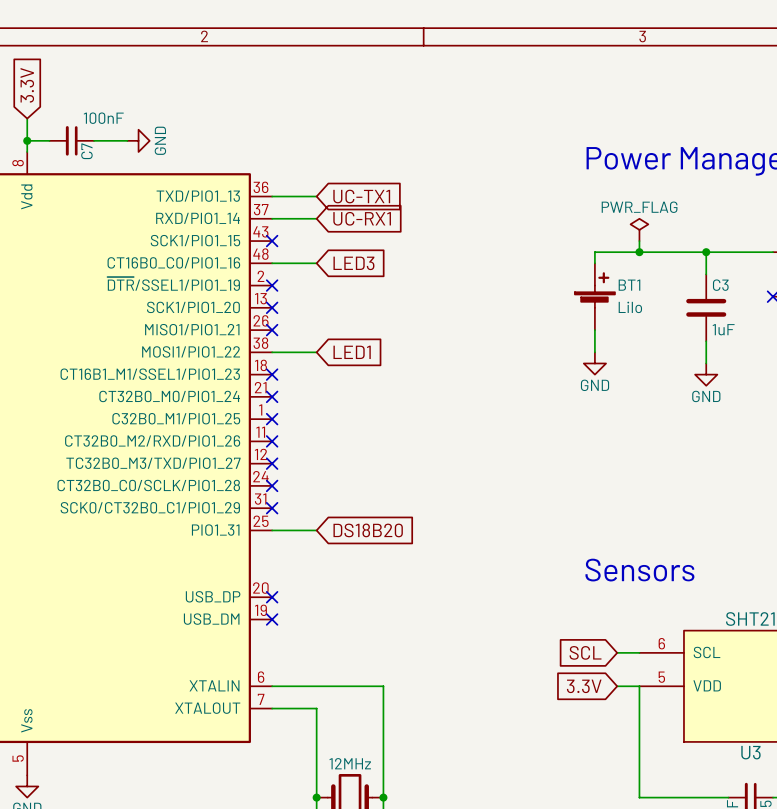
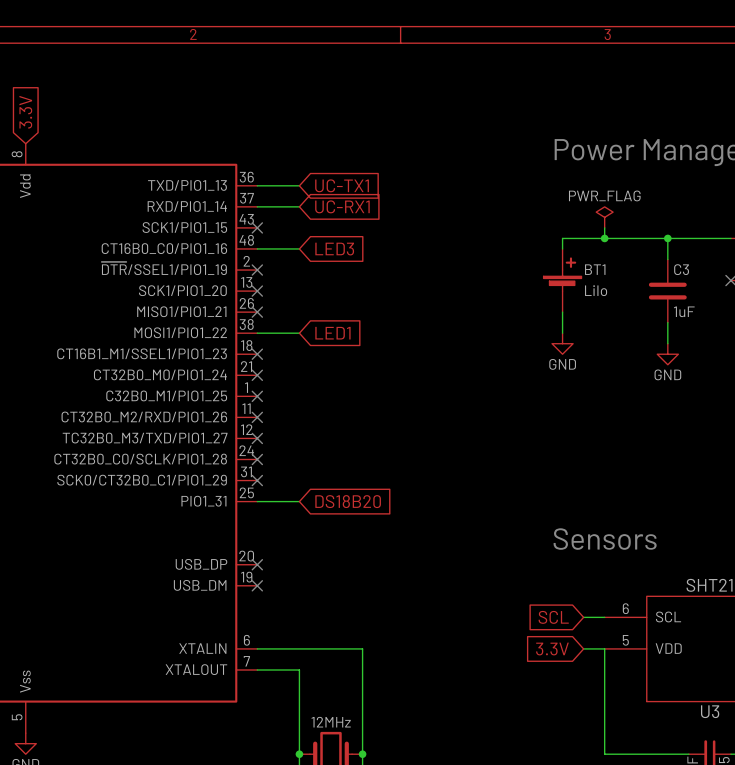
global label position: 3.3V (27, 85) -> 3.3V (25, 112)
wire: (27, 118) (27, 151) -> none
wire: (27, 140) (49, 140) -> none
junction: (27, 140) -> none
C7: 100nF (71, 140) -> none
wire: (94, 140) (127, 140) -> none
power symbol: GND (138, 140) -> none

